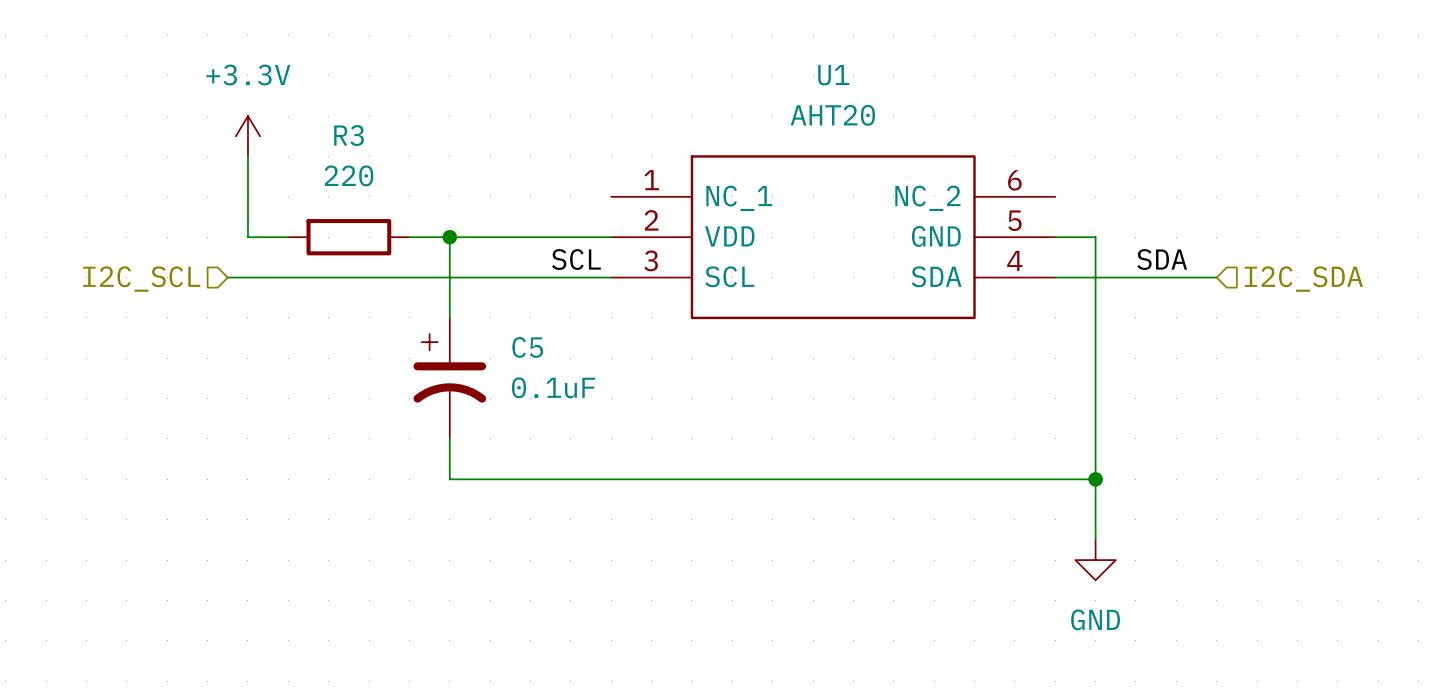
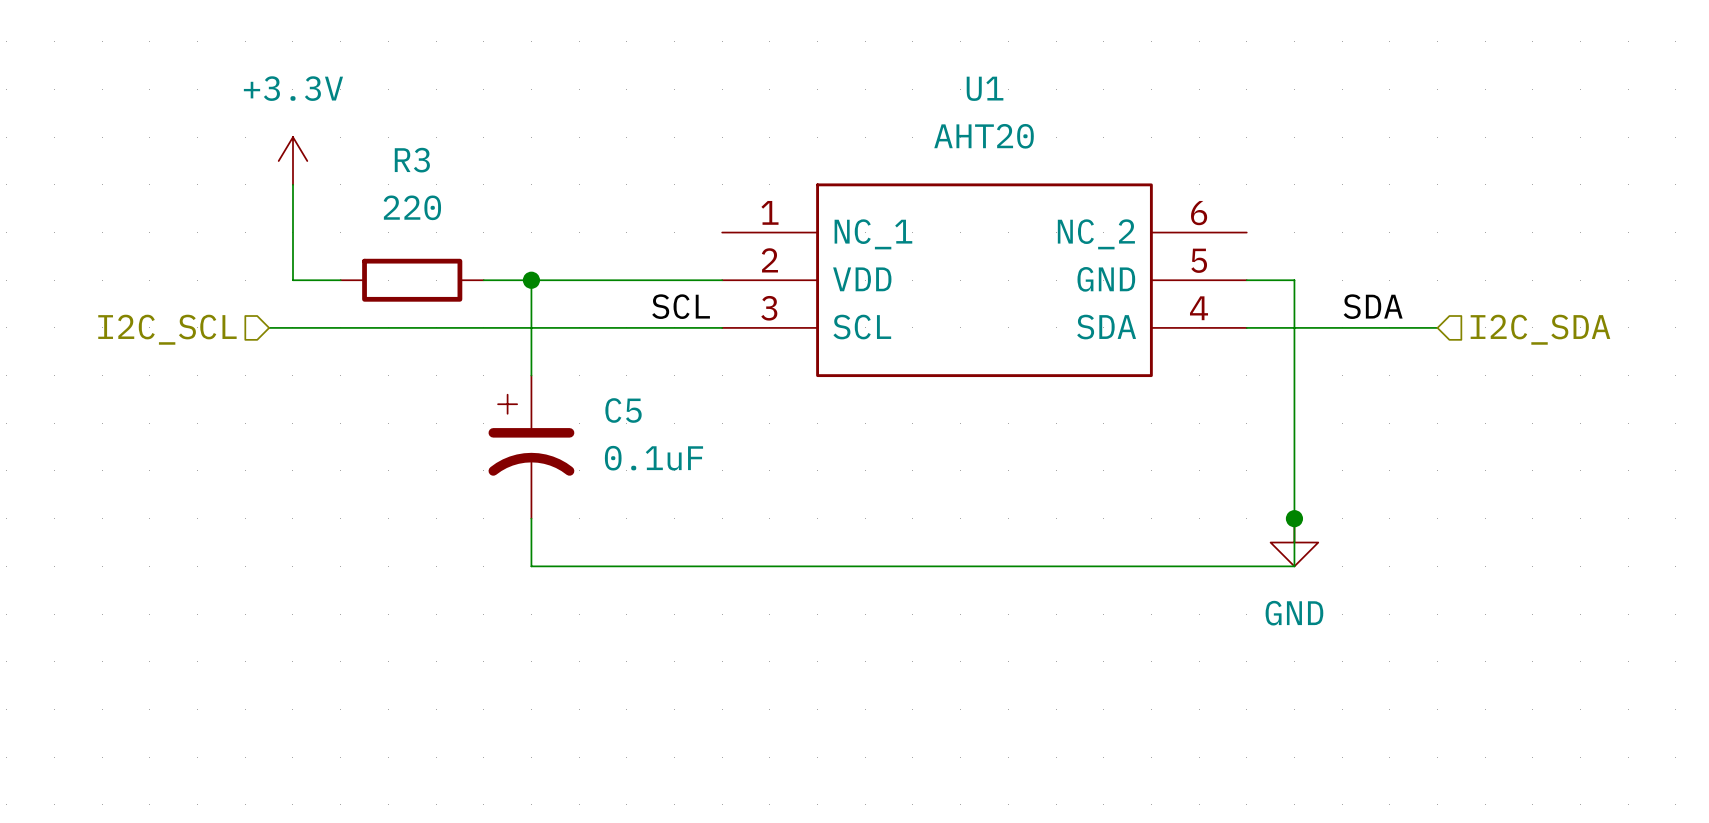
wire: (1095, 479) (1095, 539) -> none
junction position: (1095, 479) -> (1294, 518)
power symbol position: GND (1095, 560) -> GND (1294, 542)

